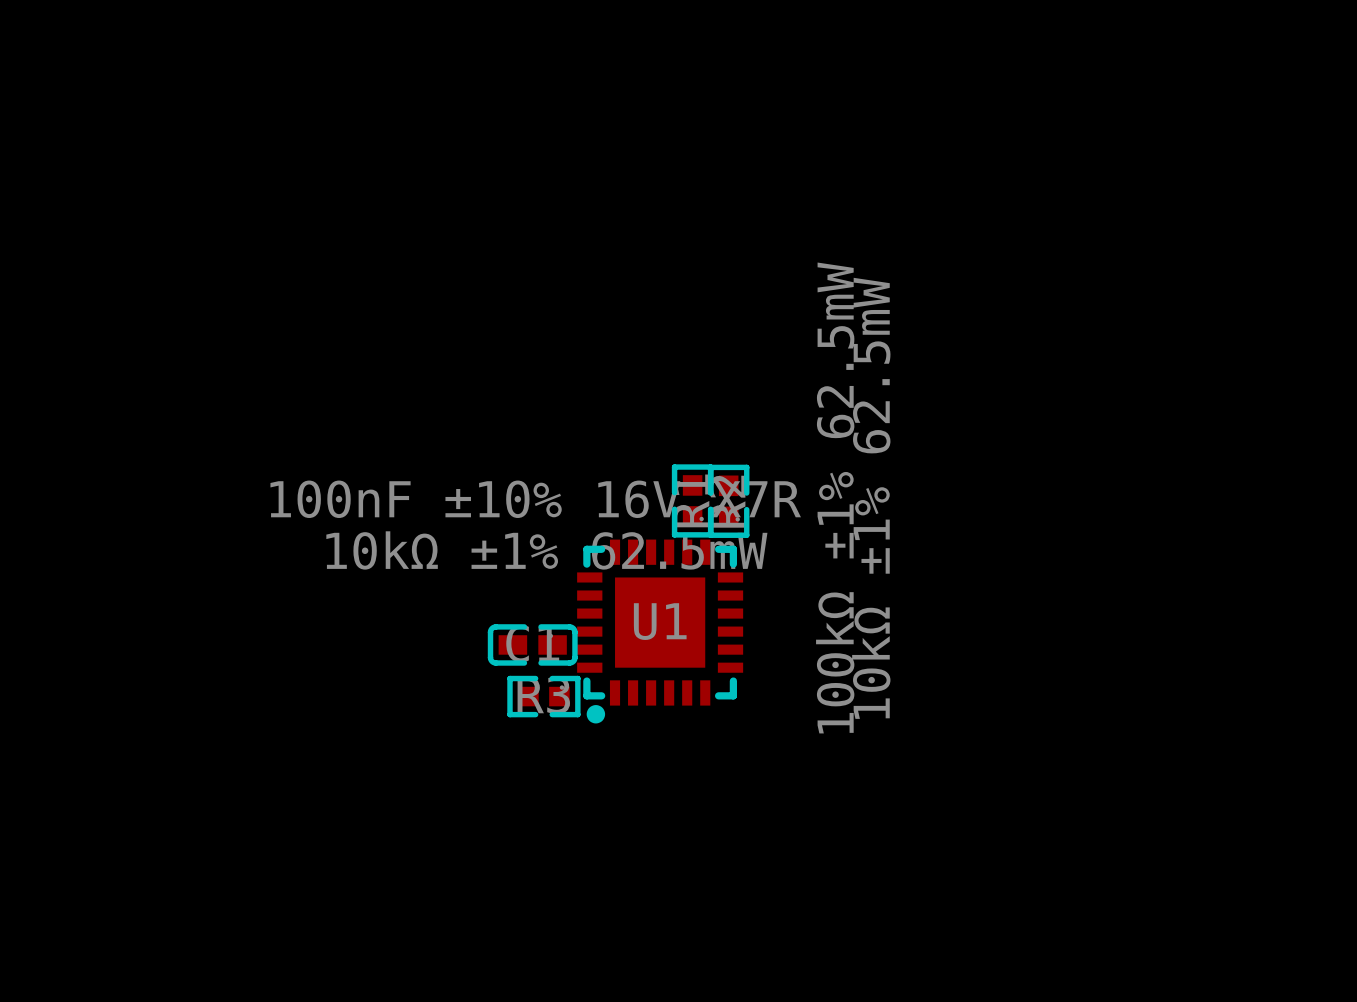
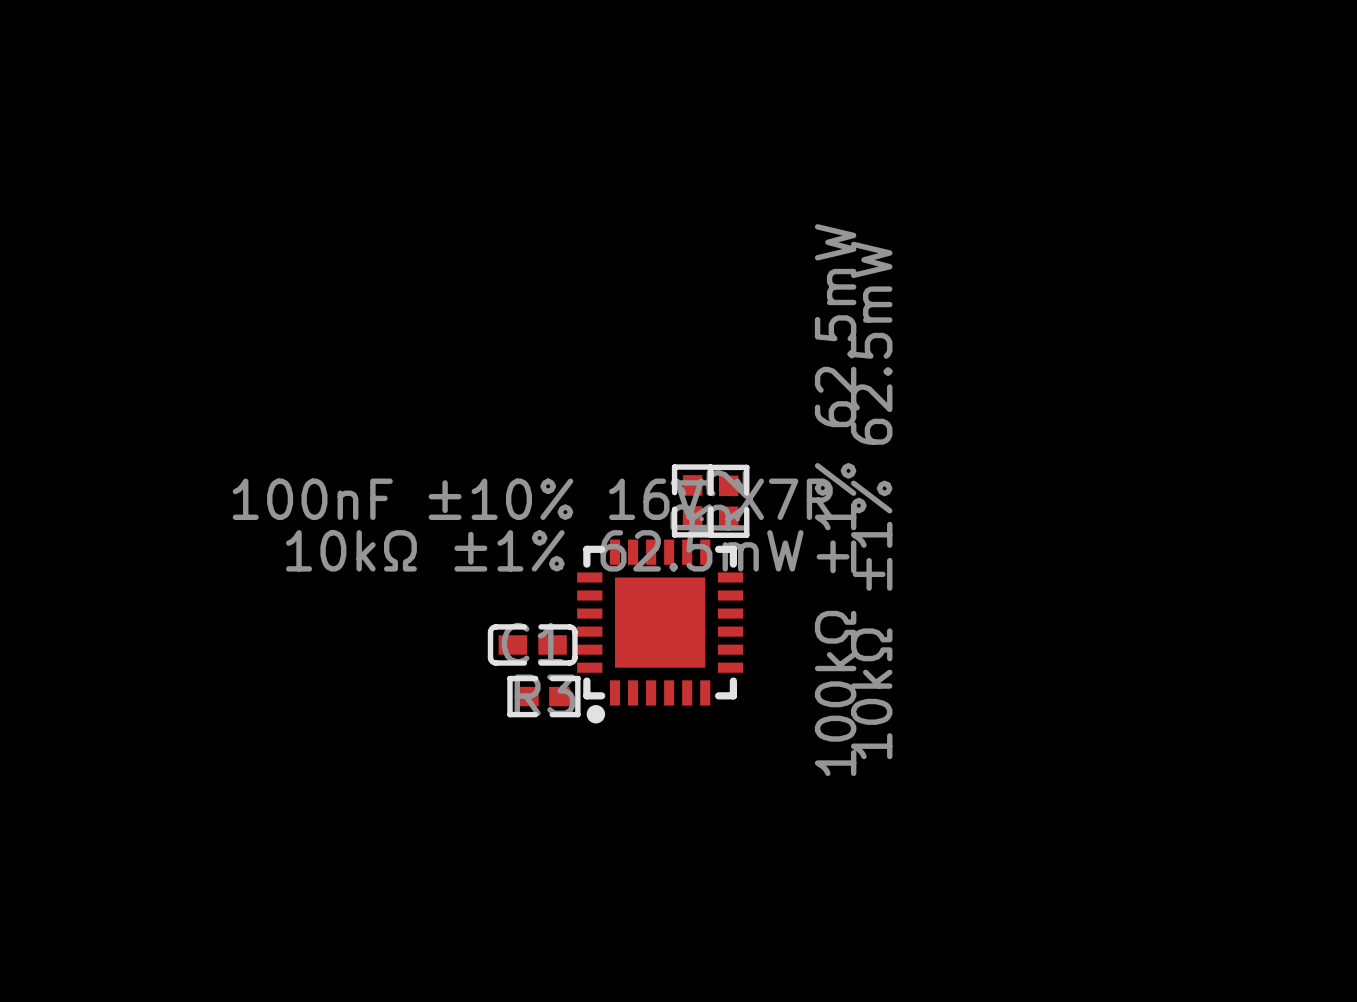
U1 name: U1 (660, 621) -> none

